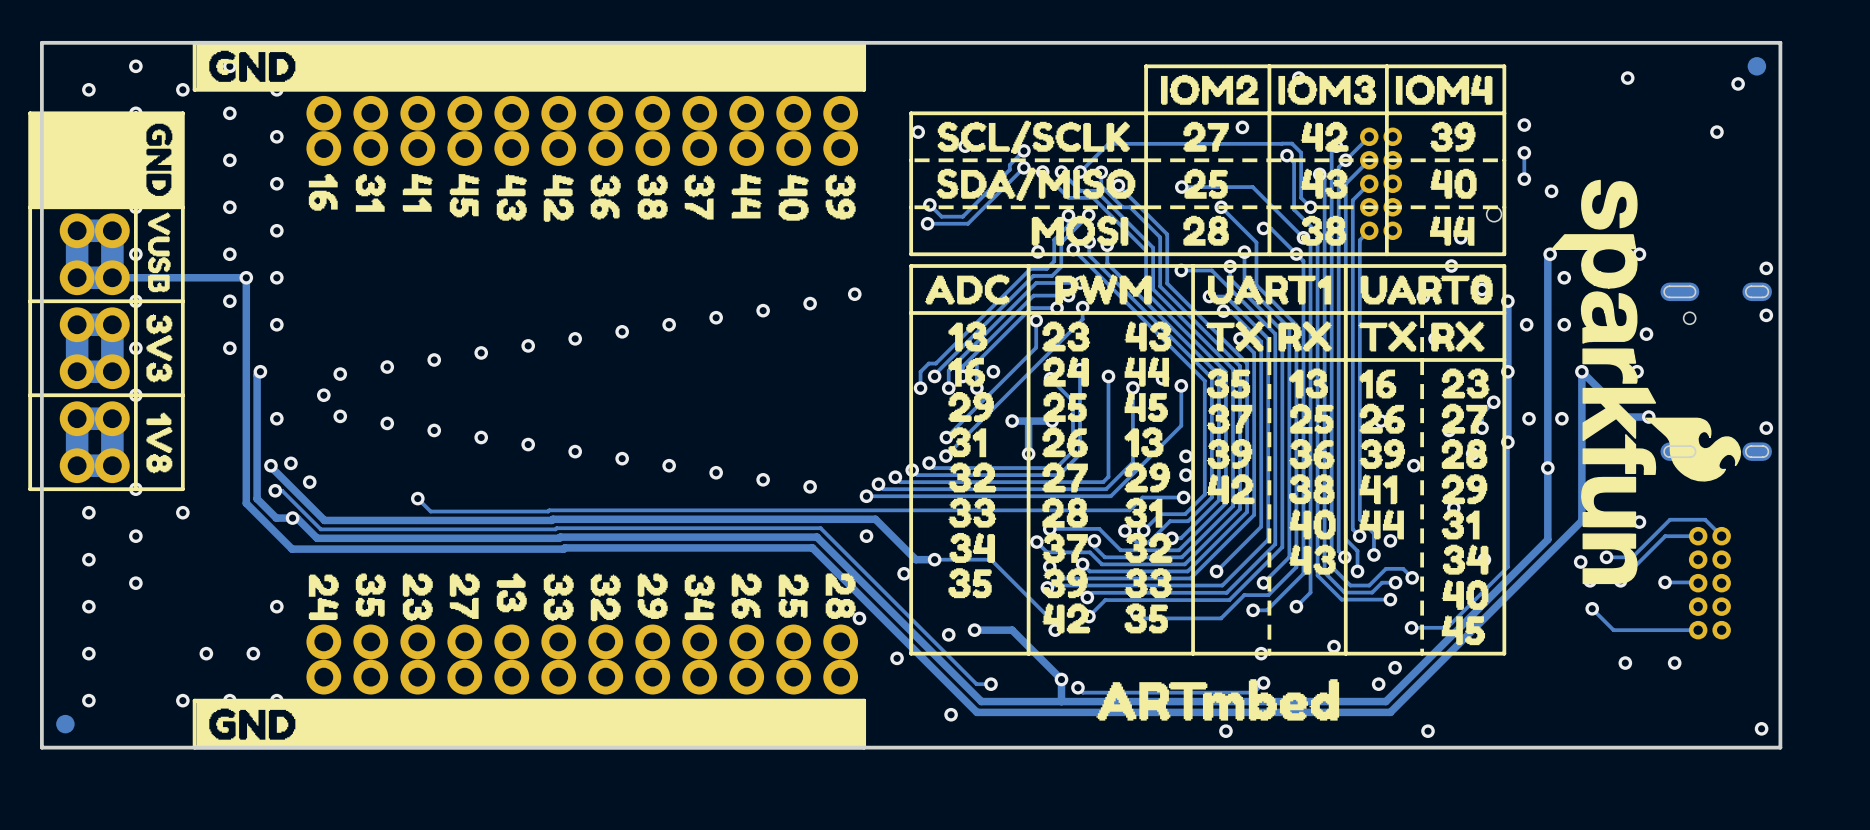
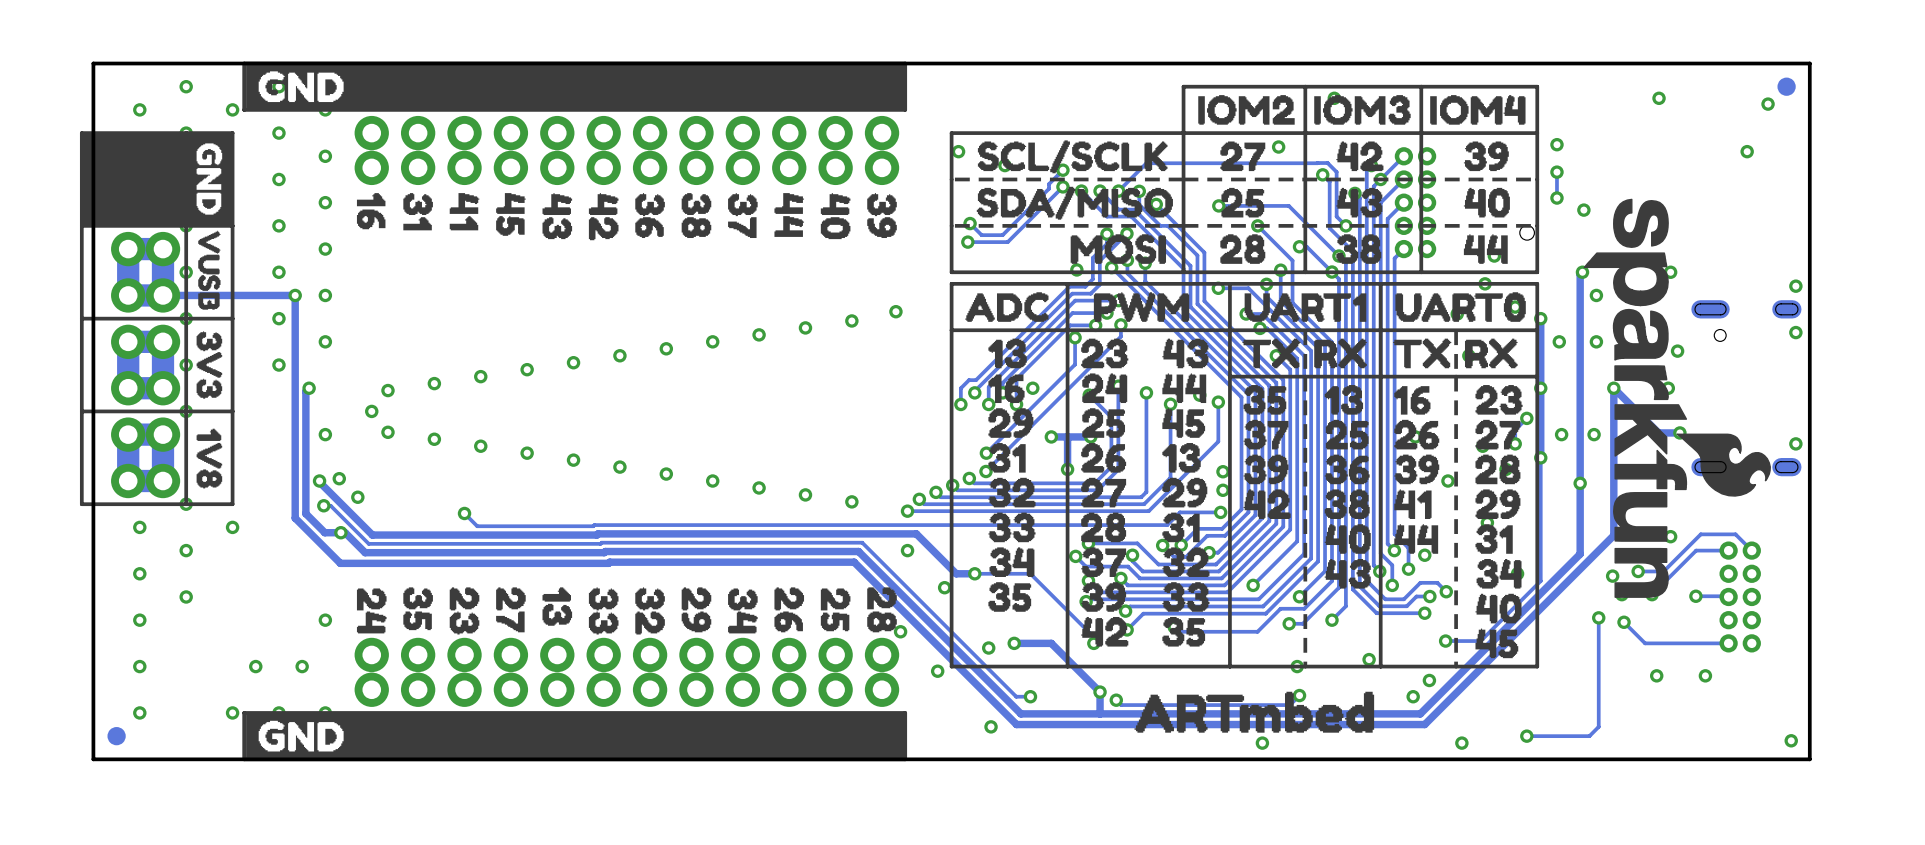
track: none -> (1598, 617) (1598, 726) (1589, 736) (1526, 736)
via: none -> (1598, 617)
via: none -> (1526, 736)

